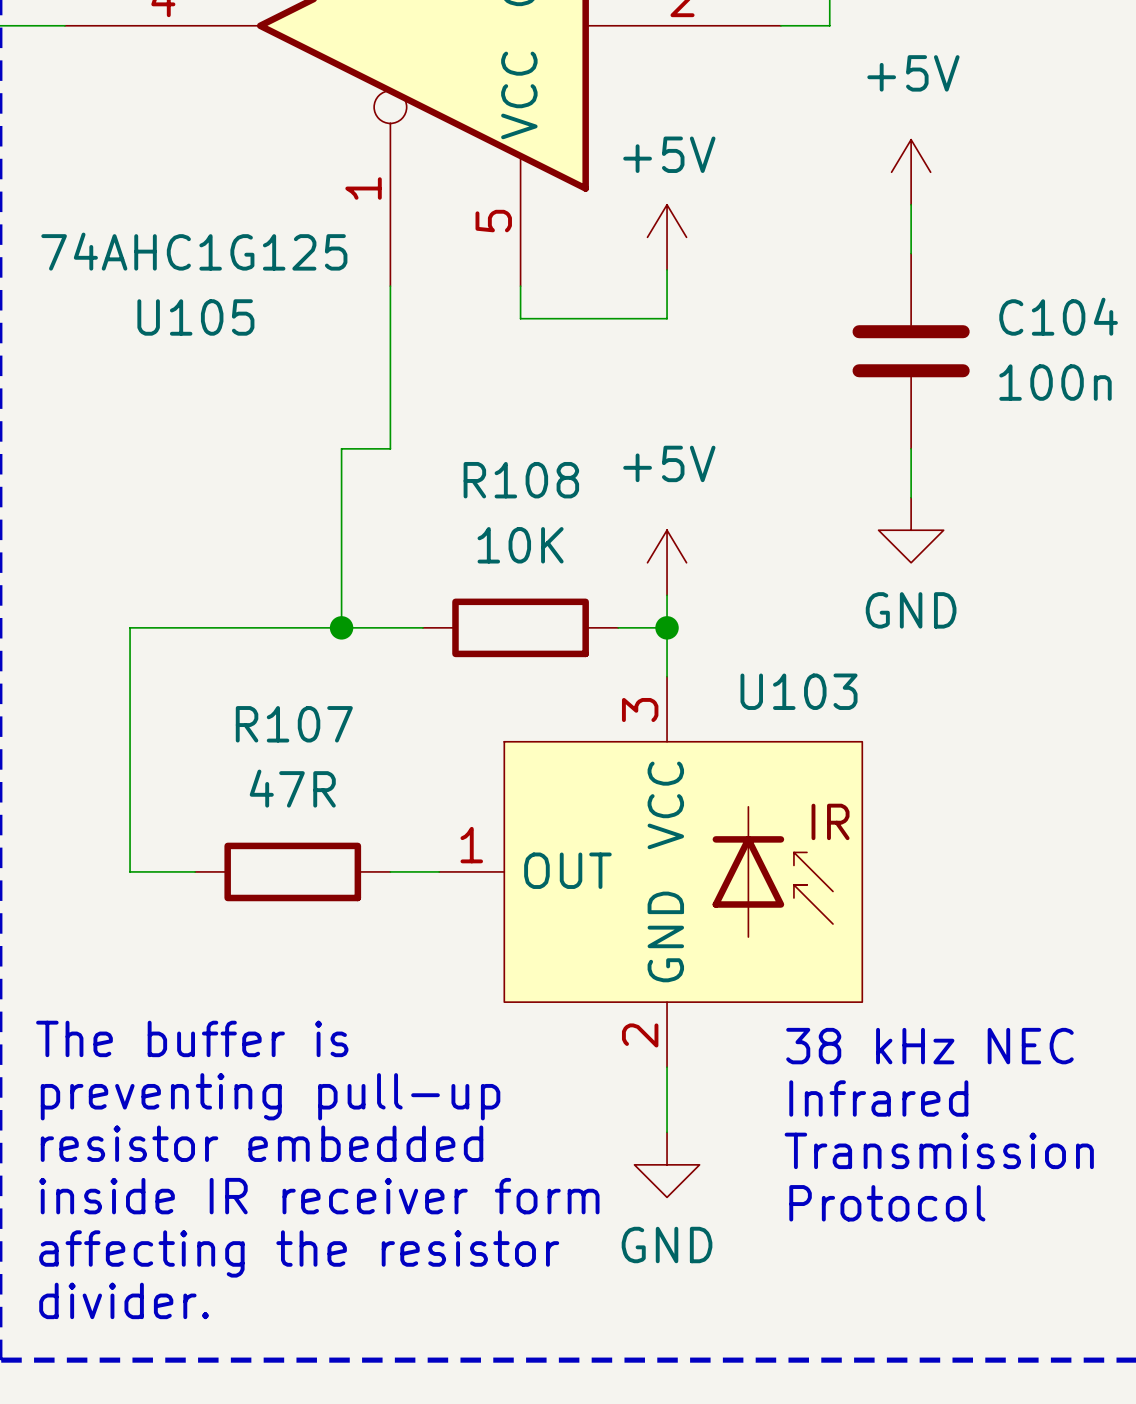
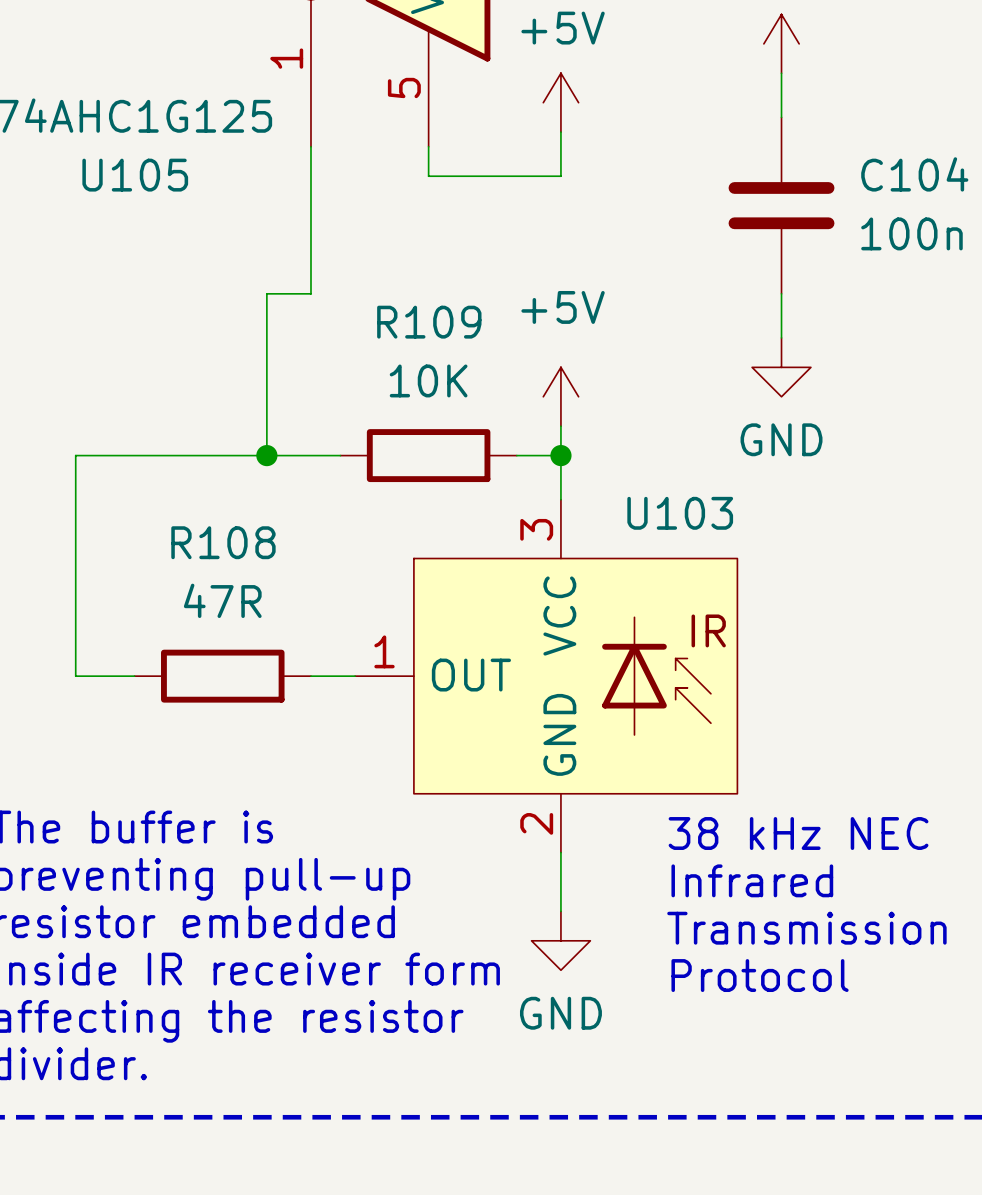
R108 name: R108 (521, 480) -> R109 (429, 322)
R107 name: R107 (294, 724) -> R108 (223, 542)

